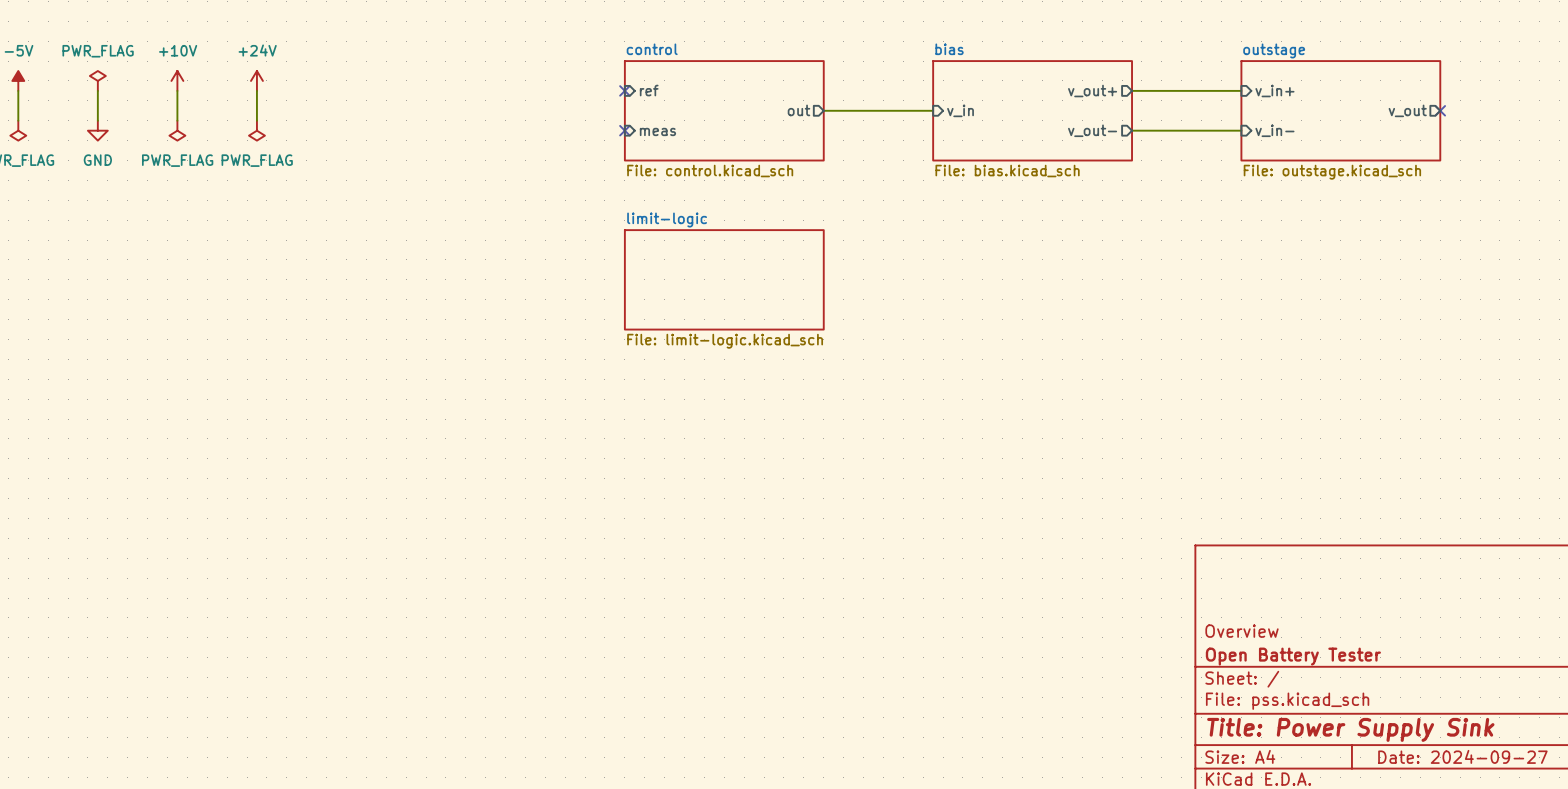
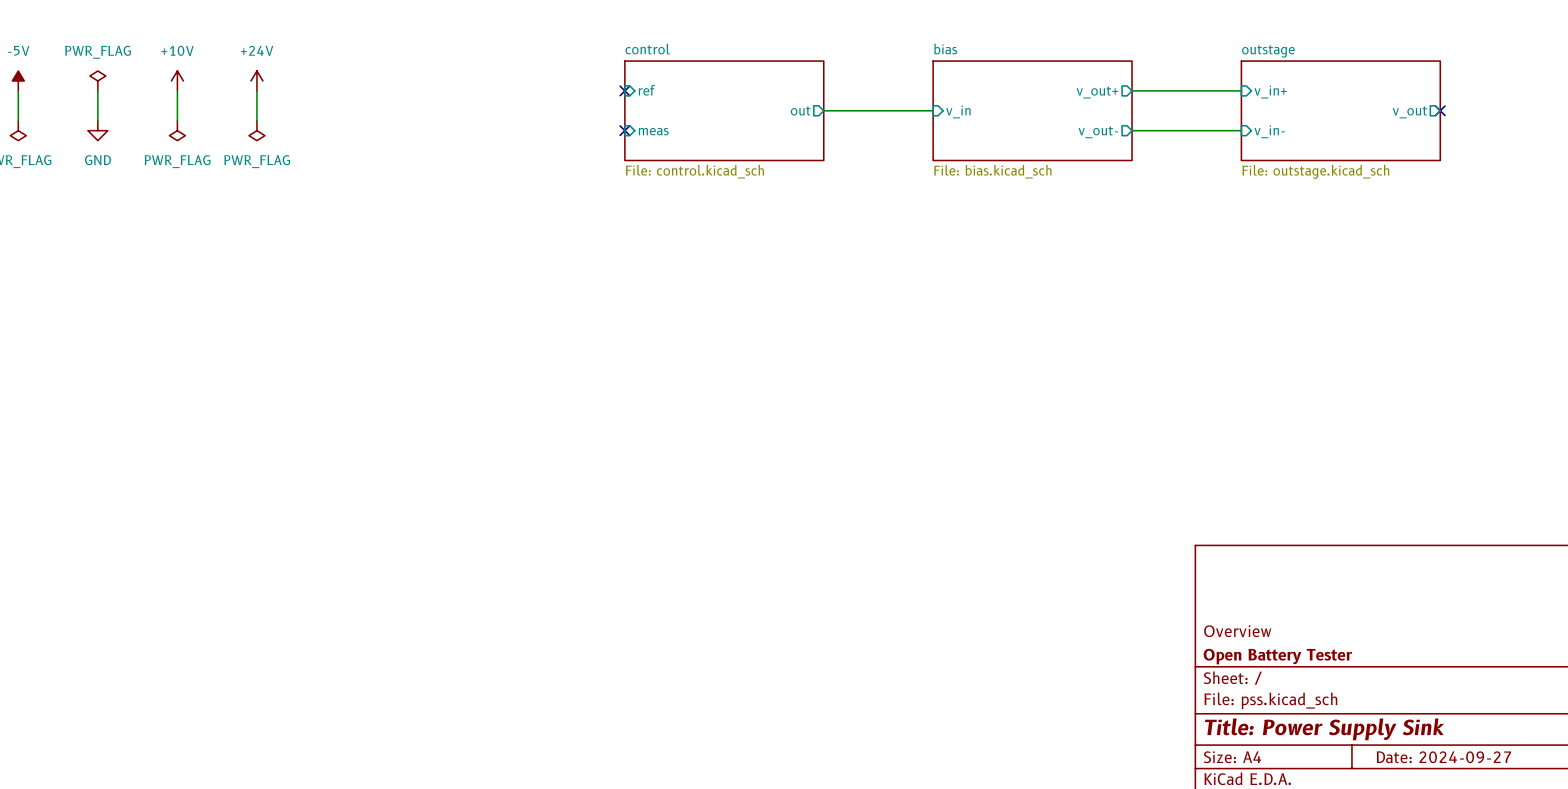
sheet limit-logic: File: limit-logic.kicad_sch (724, 279) -> none

